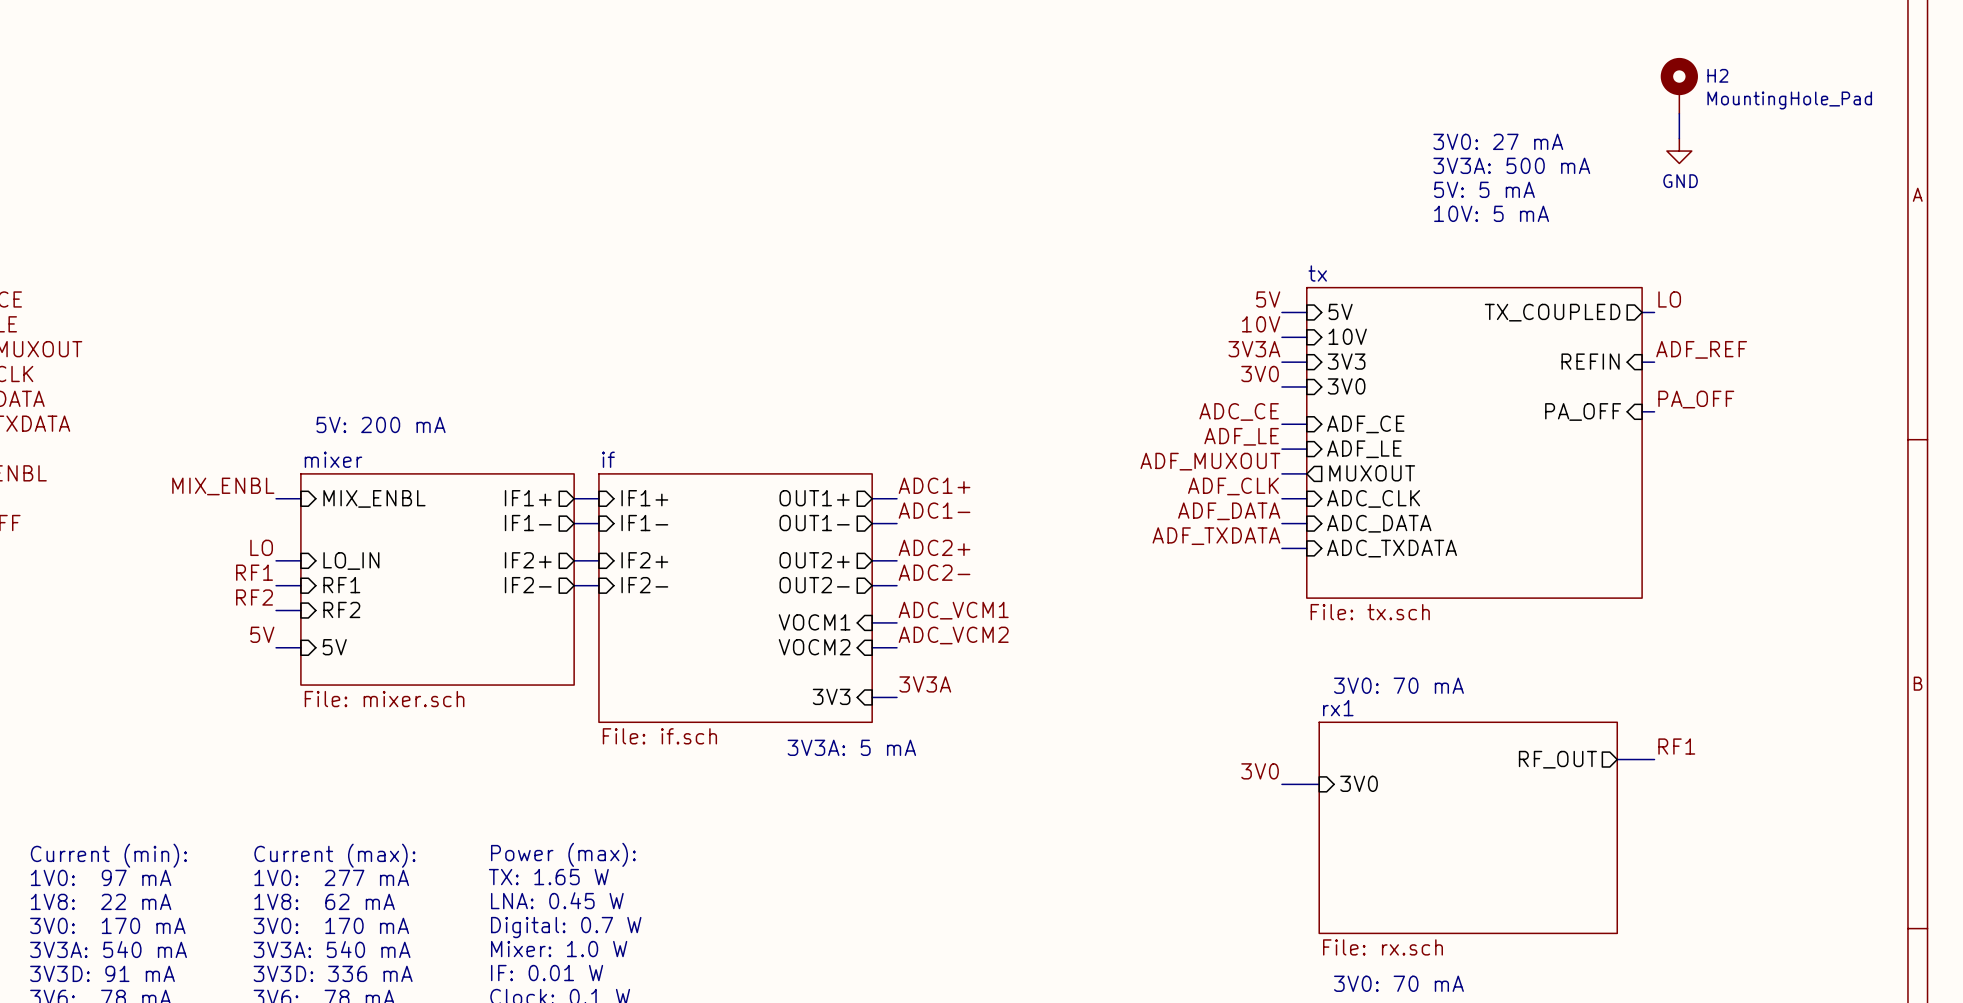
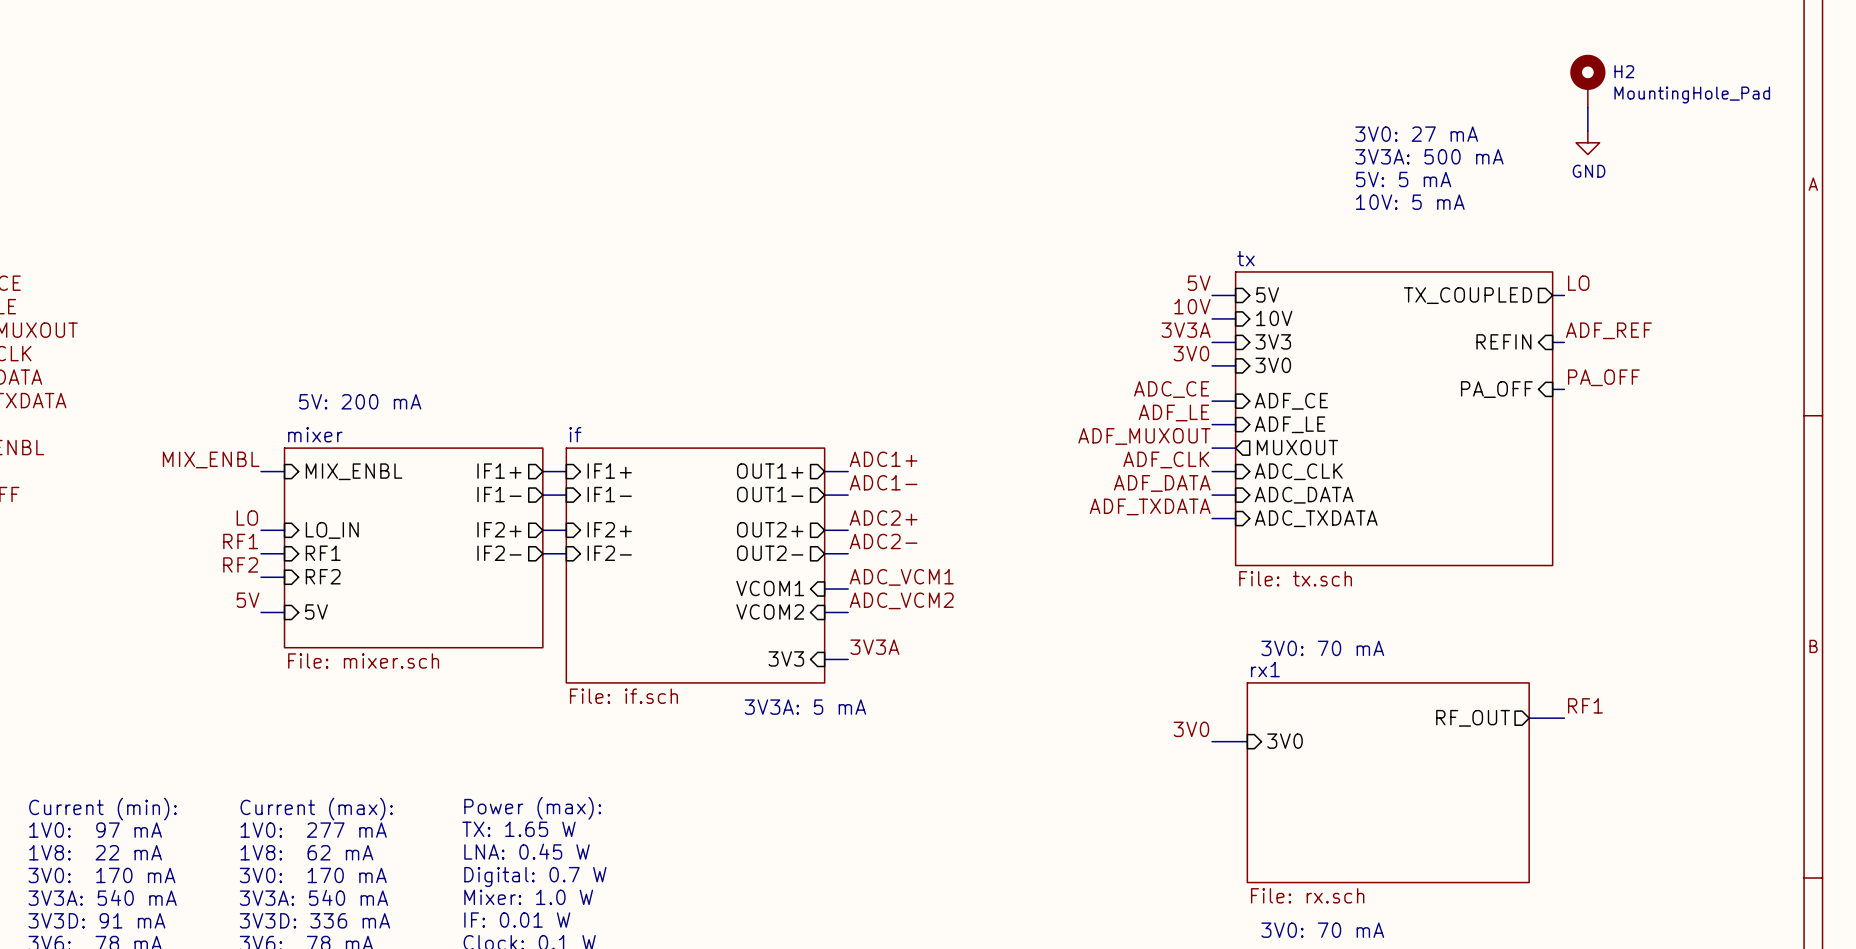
sheet pin: VOCM1 (814, 622) -> VCOM1 (770, 588)
sheet pin: VOCM2 (814, 647) -> VCOM2 (770, 611)

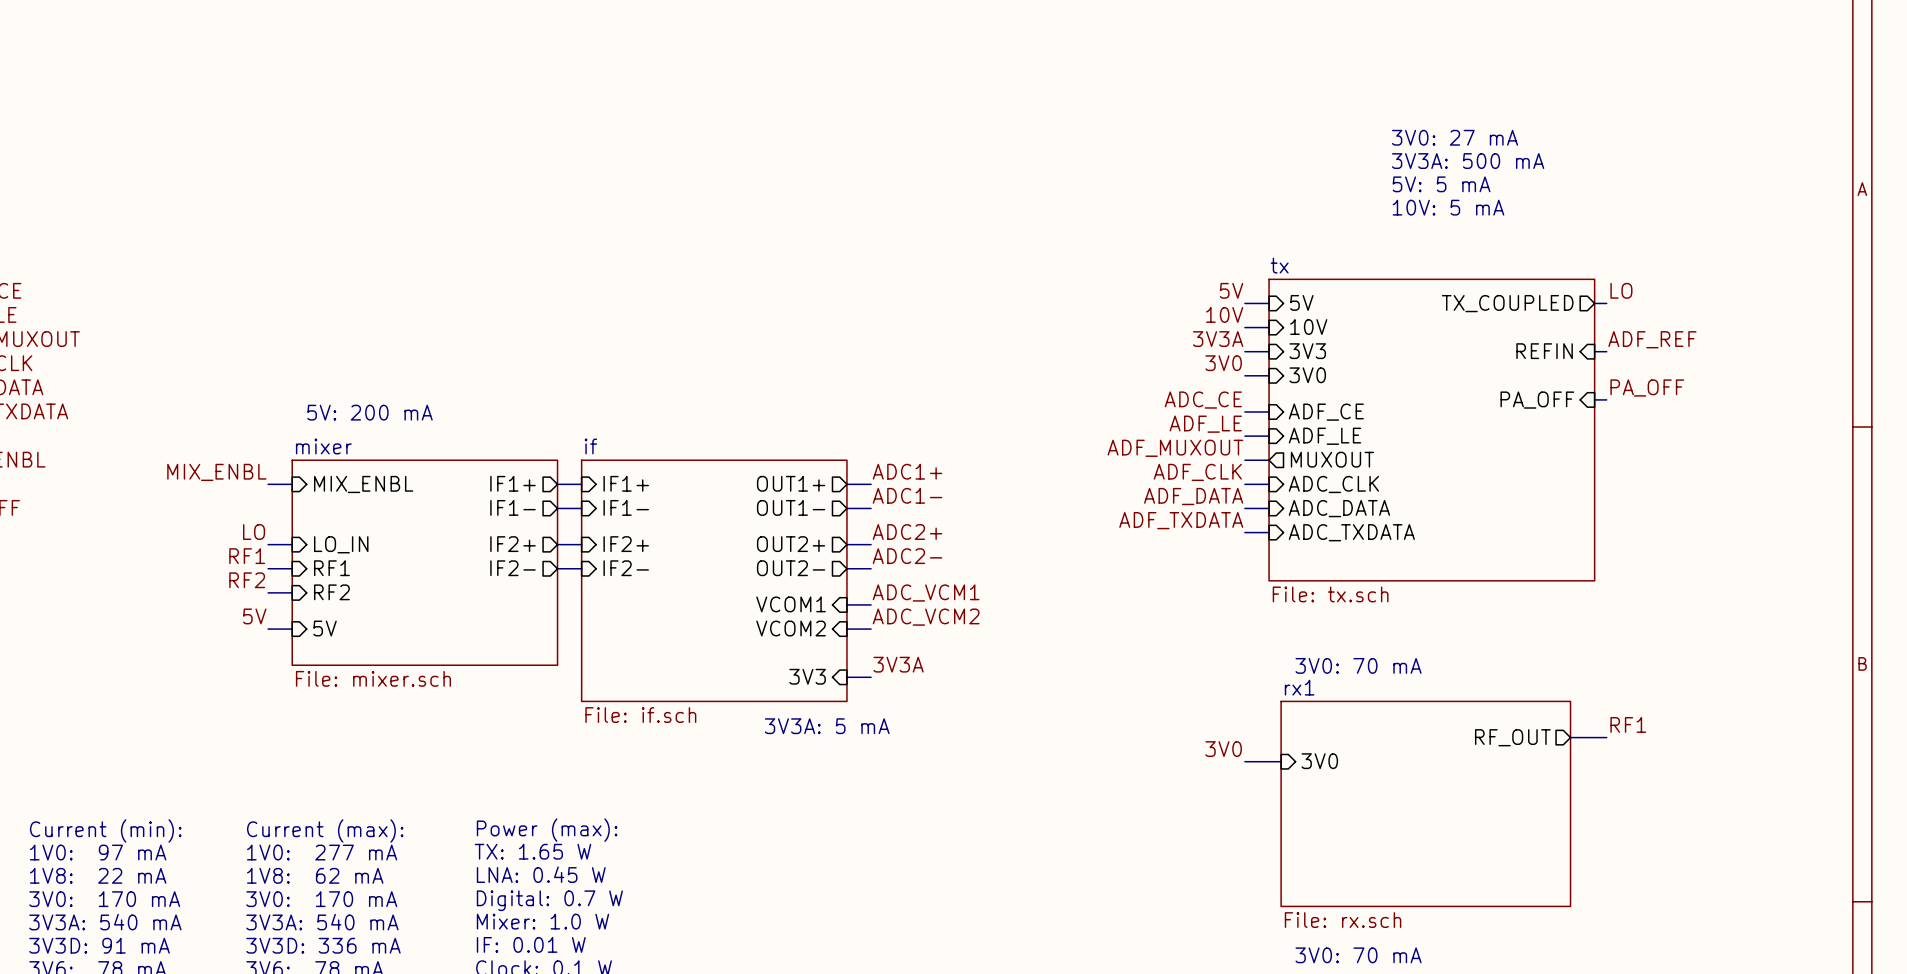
H2: MountingHole_Pad (1587, 81) -> none
wire: (1587, 107) (1587, 131) -> none
power symbol: GND (1587, 142) -> none

